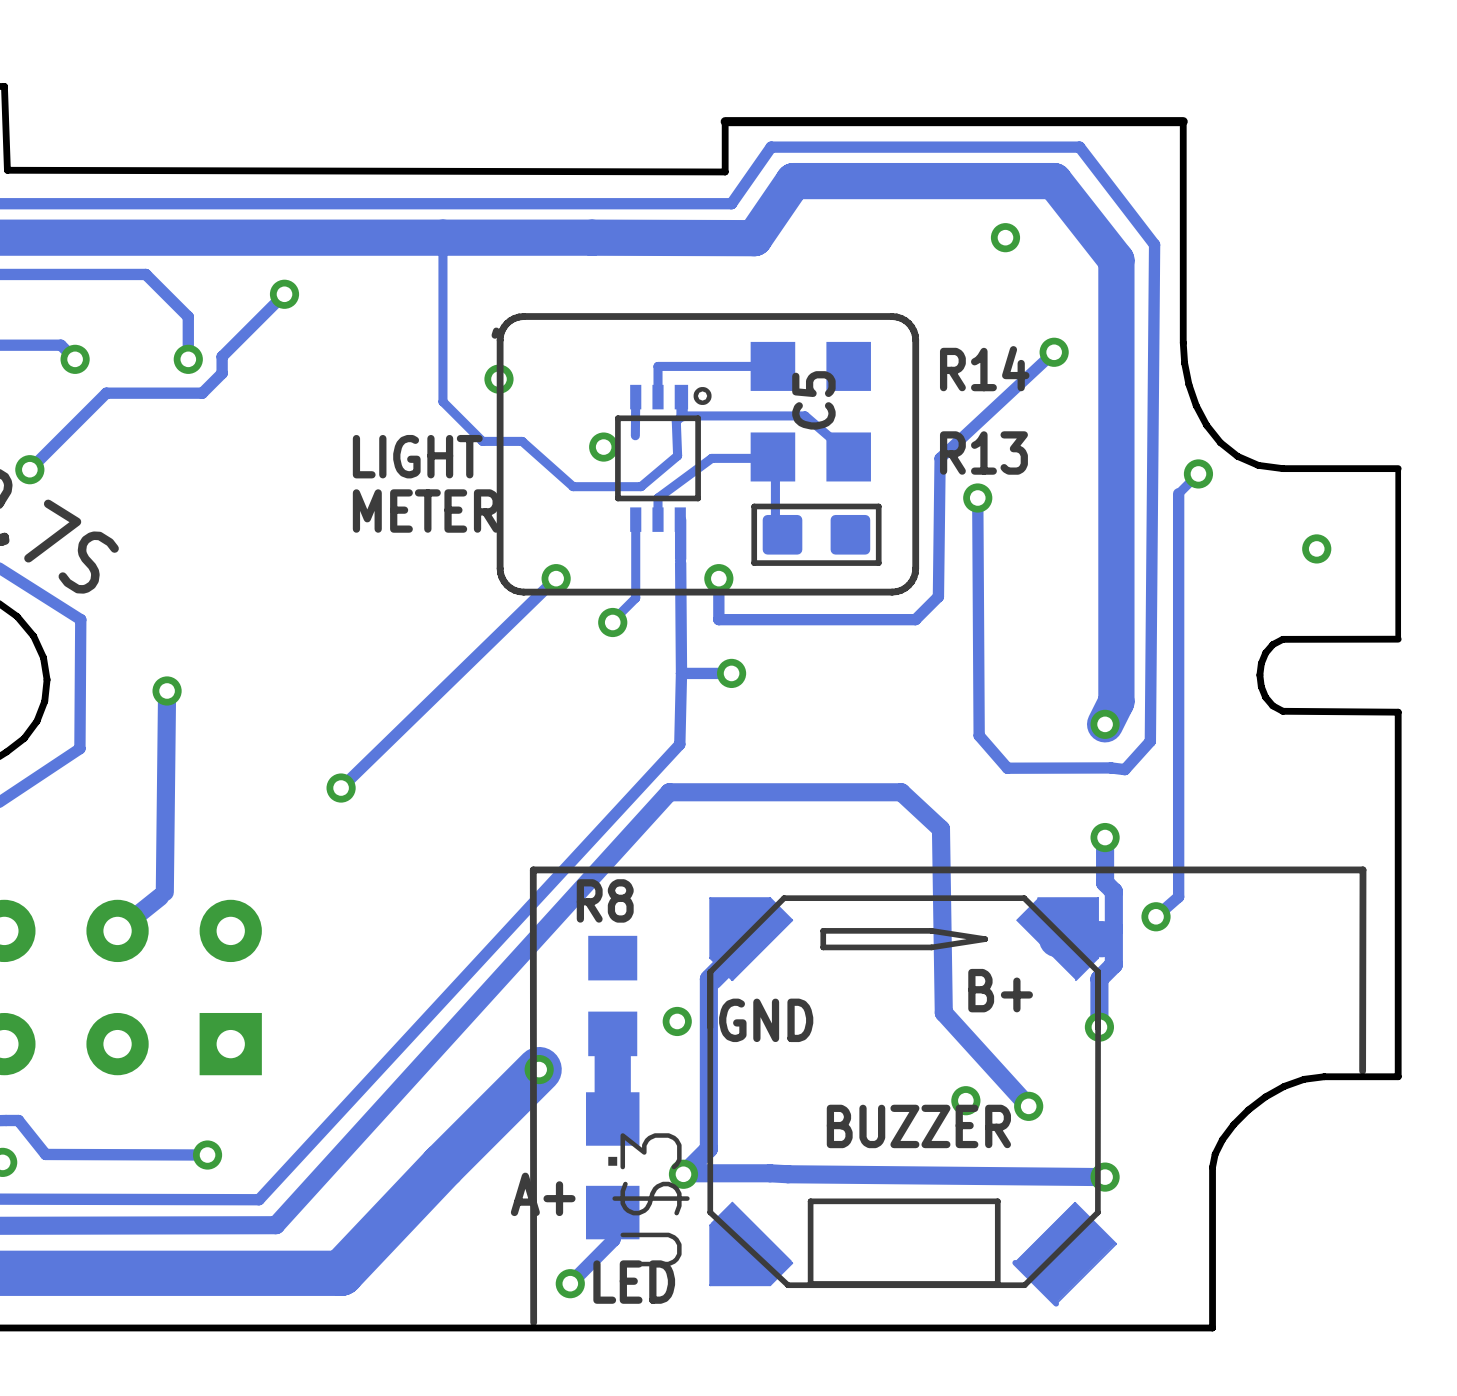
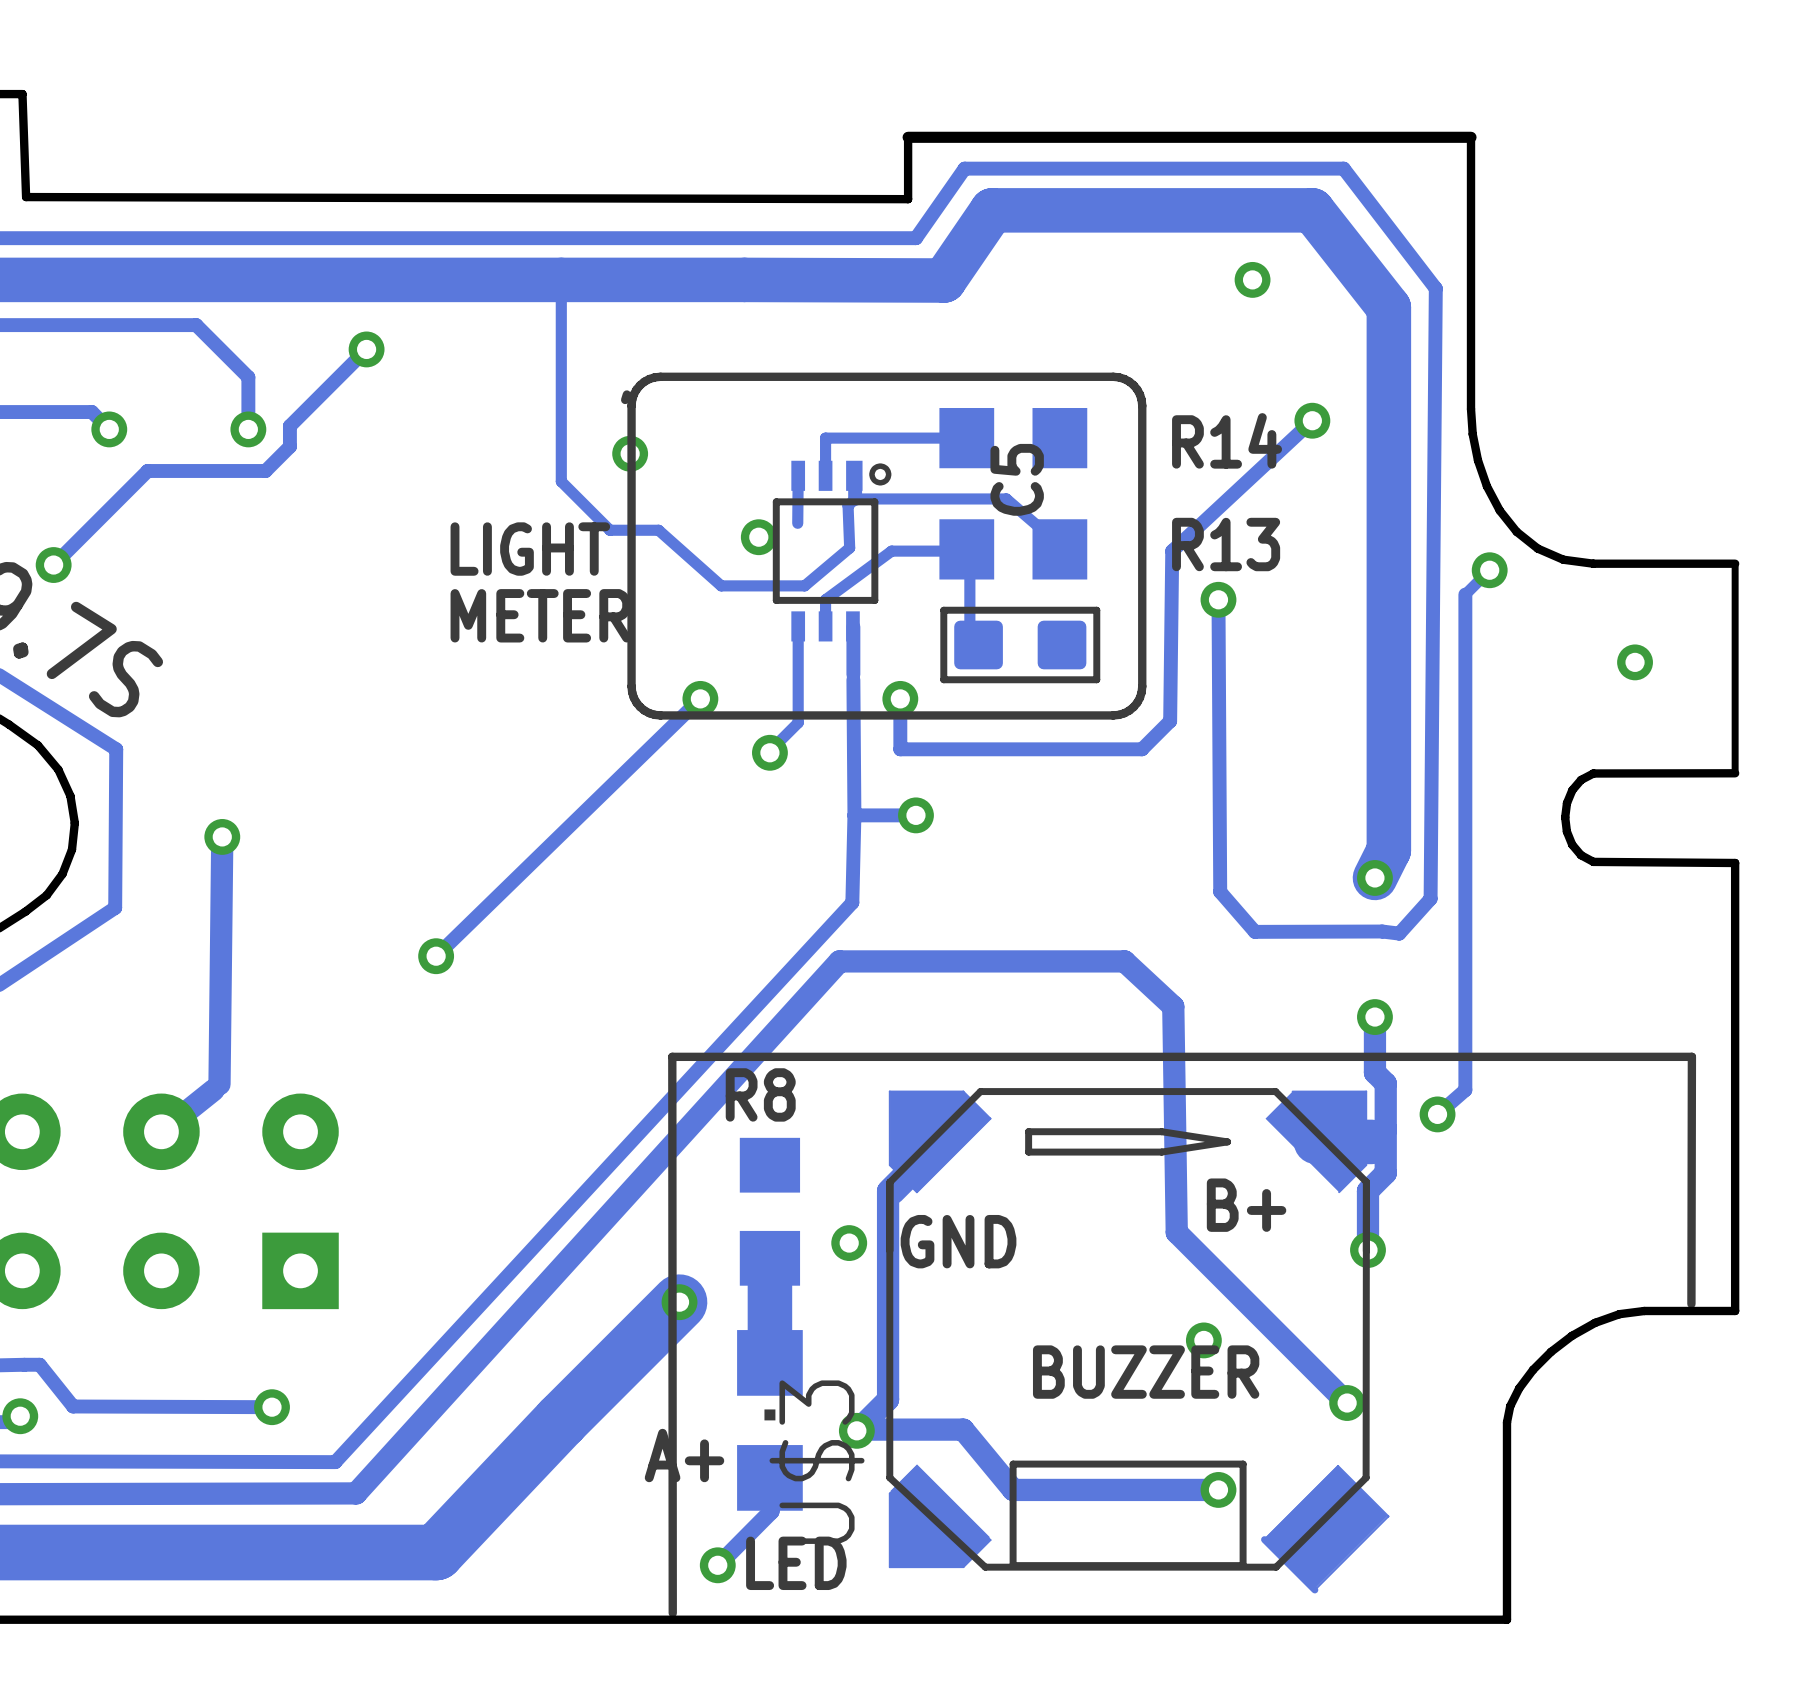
track: (943, 1012) (1028, 1106) -> (1176, 1232) (1347, 1403)
via: (1028, 1106) -> none
track: (770, 1173) (1105, 1177) -> (963, 1429) (1013, 1489) (1218, 1489)
via position: (1105, 1177) -> (1347, 1403)
via: none -> (1218, 1489)

